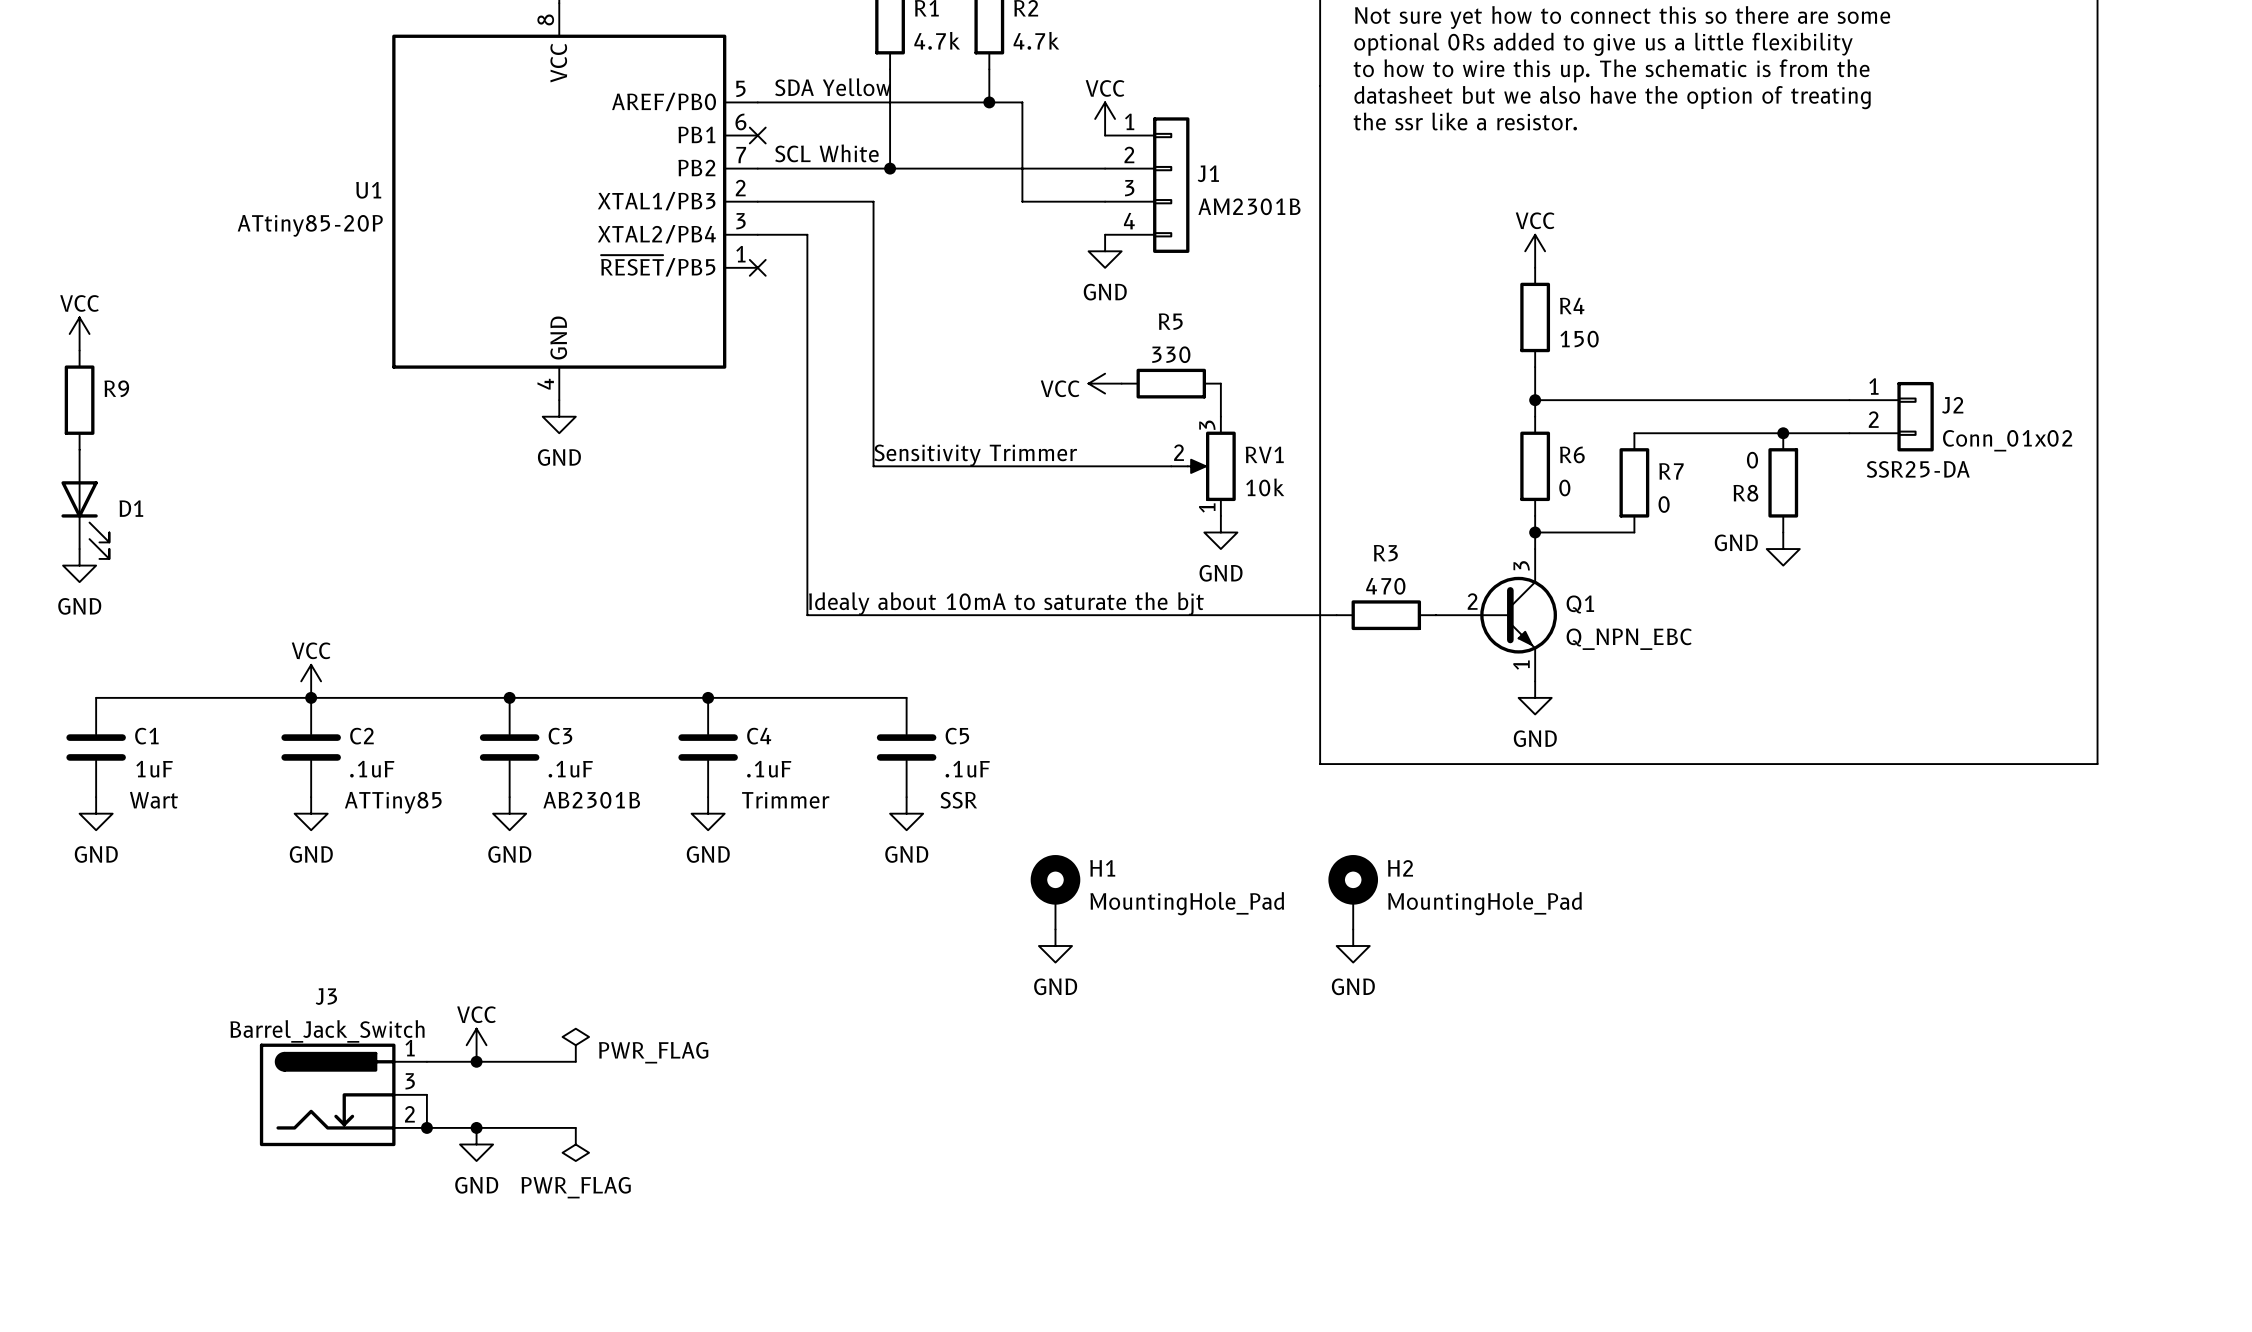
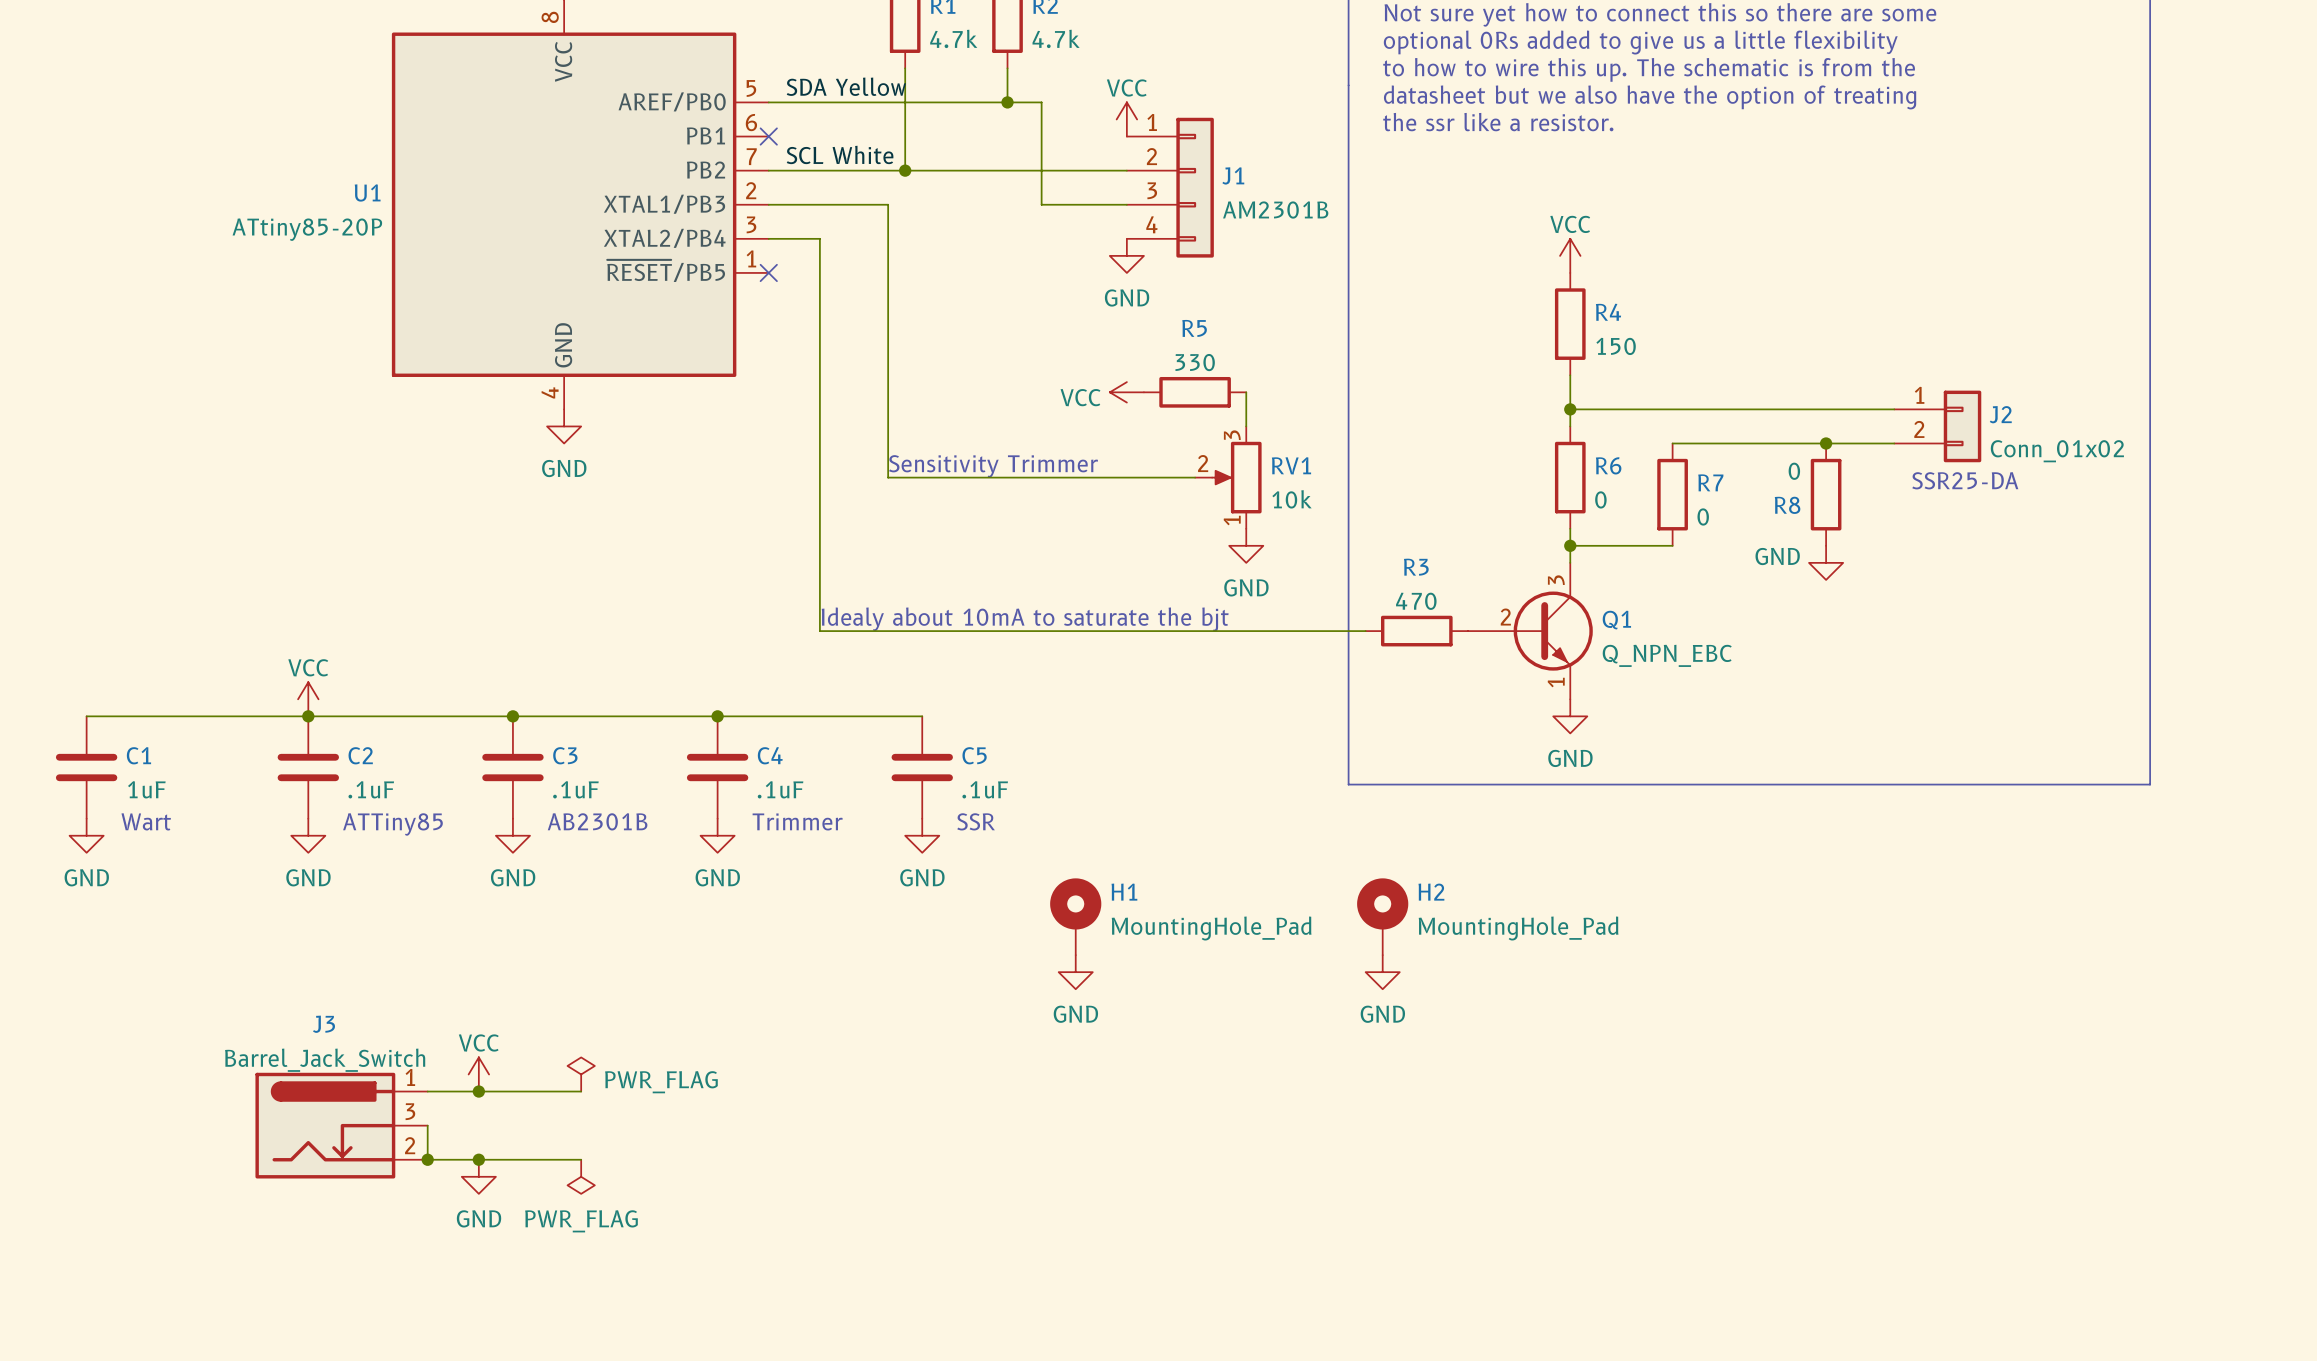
power symbol: VCC (79, 334) -> none
R9: (79, 400) -> none
D1: (85, 504) -> none
power symbol: GND (79, 565) -> none

